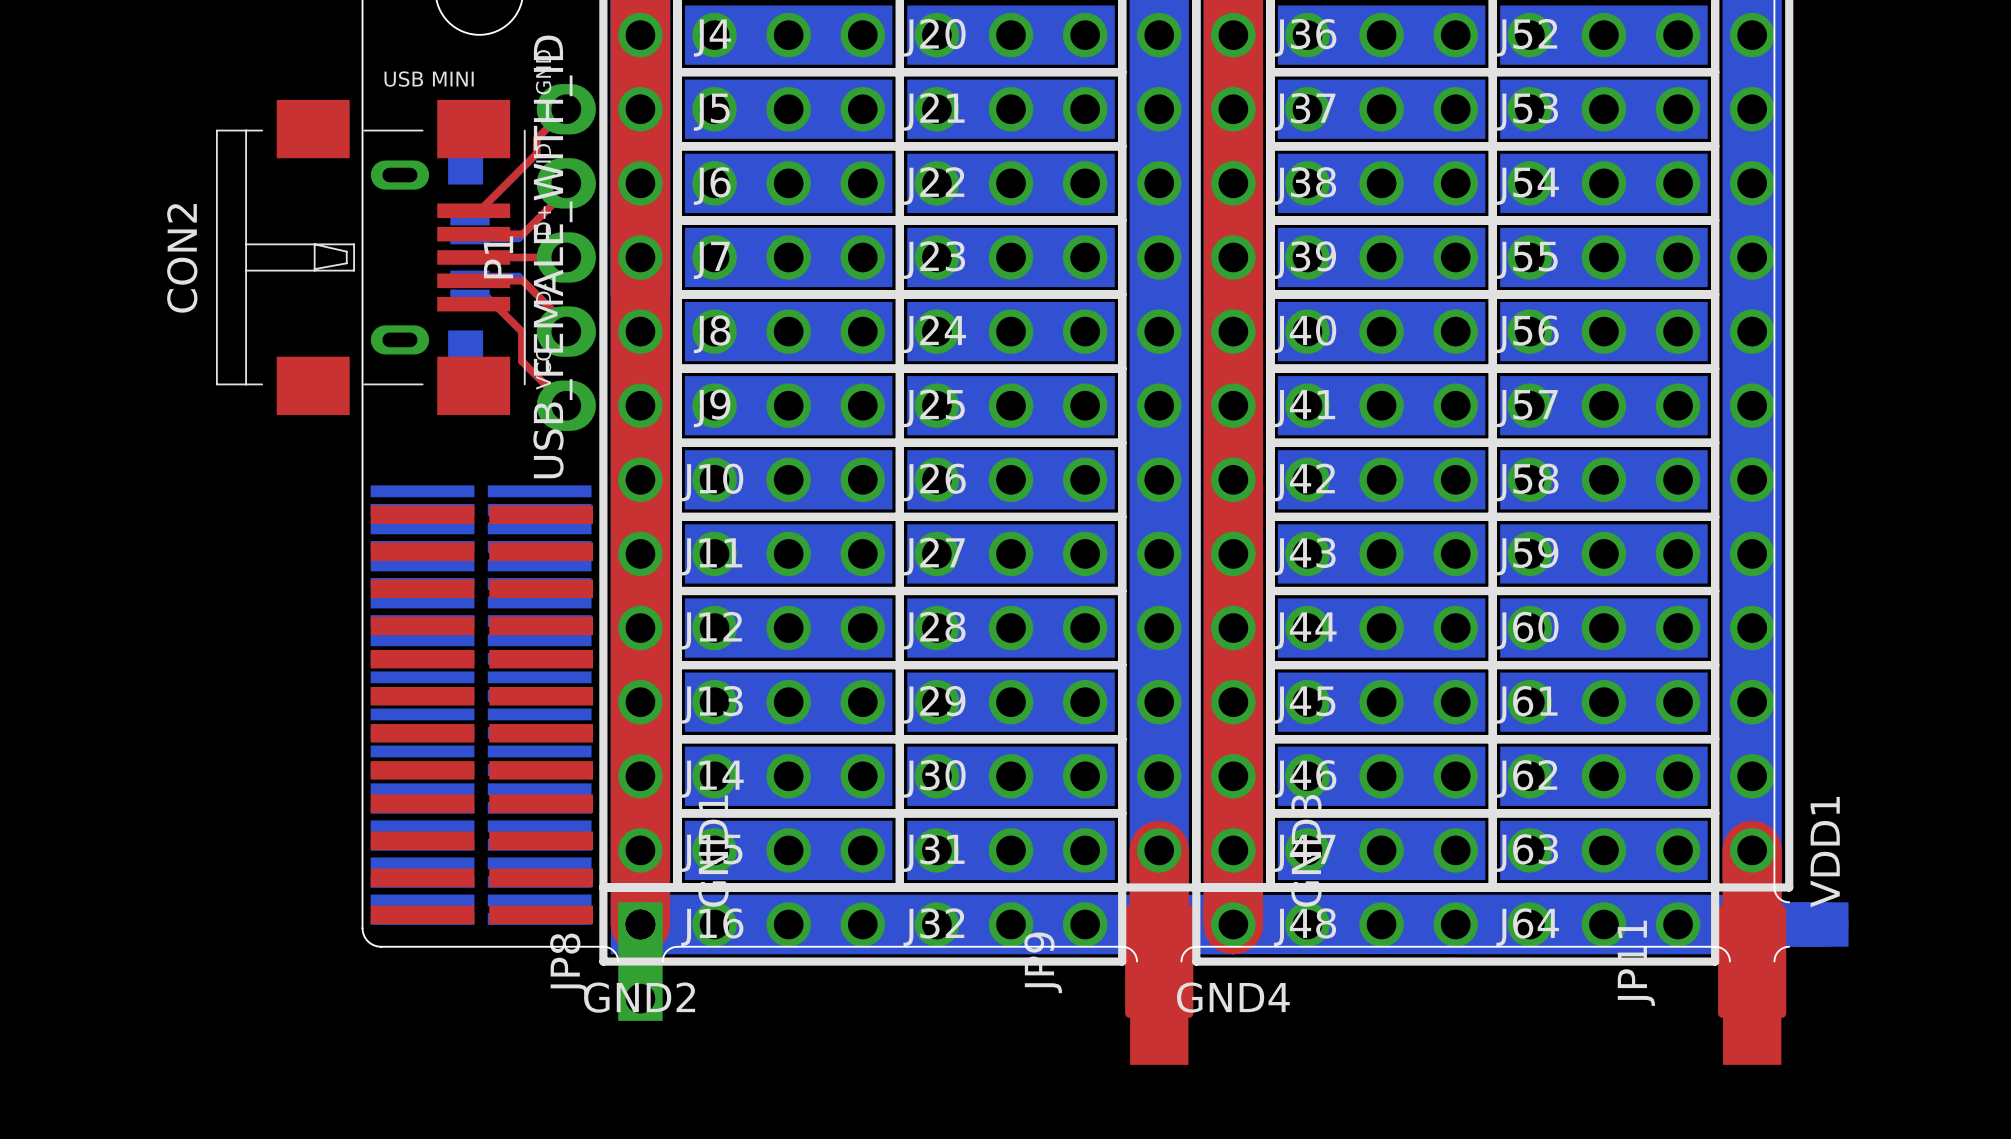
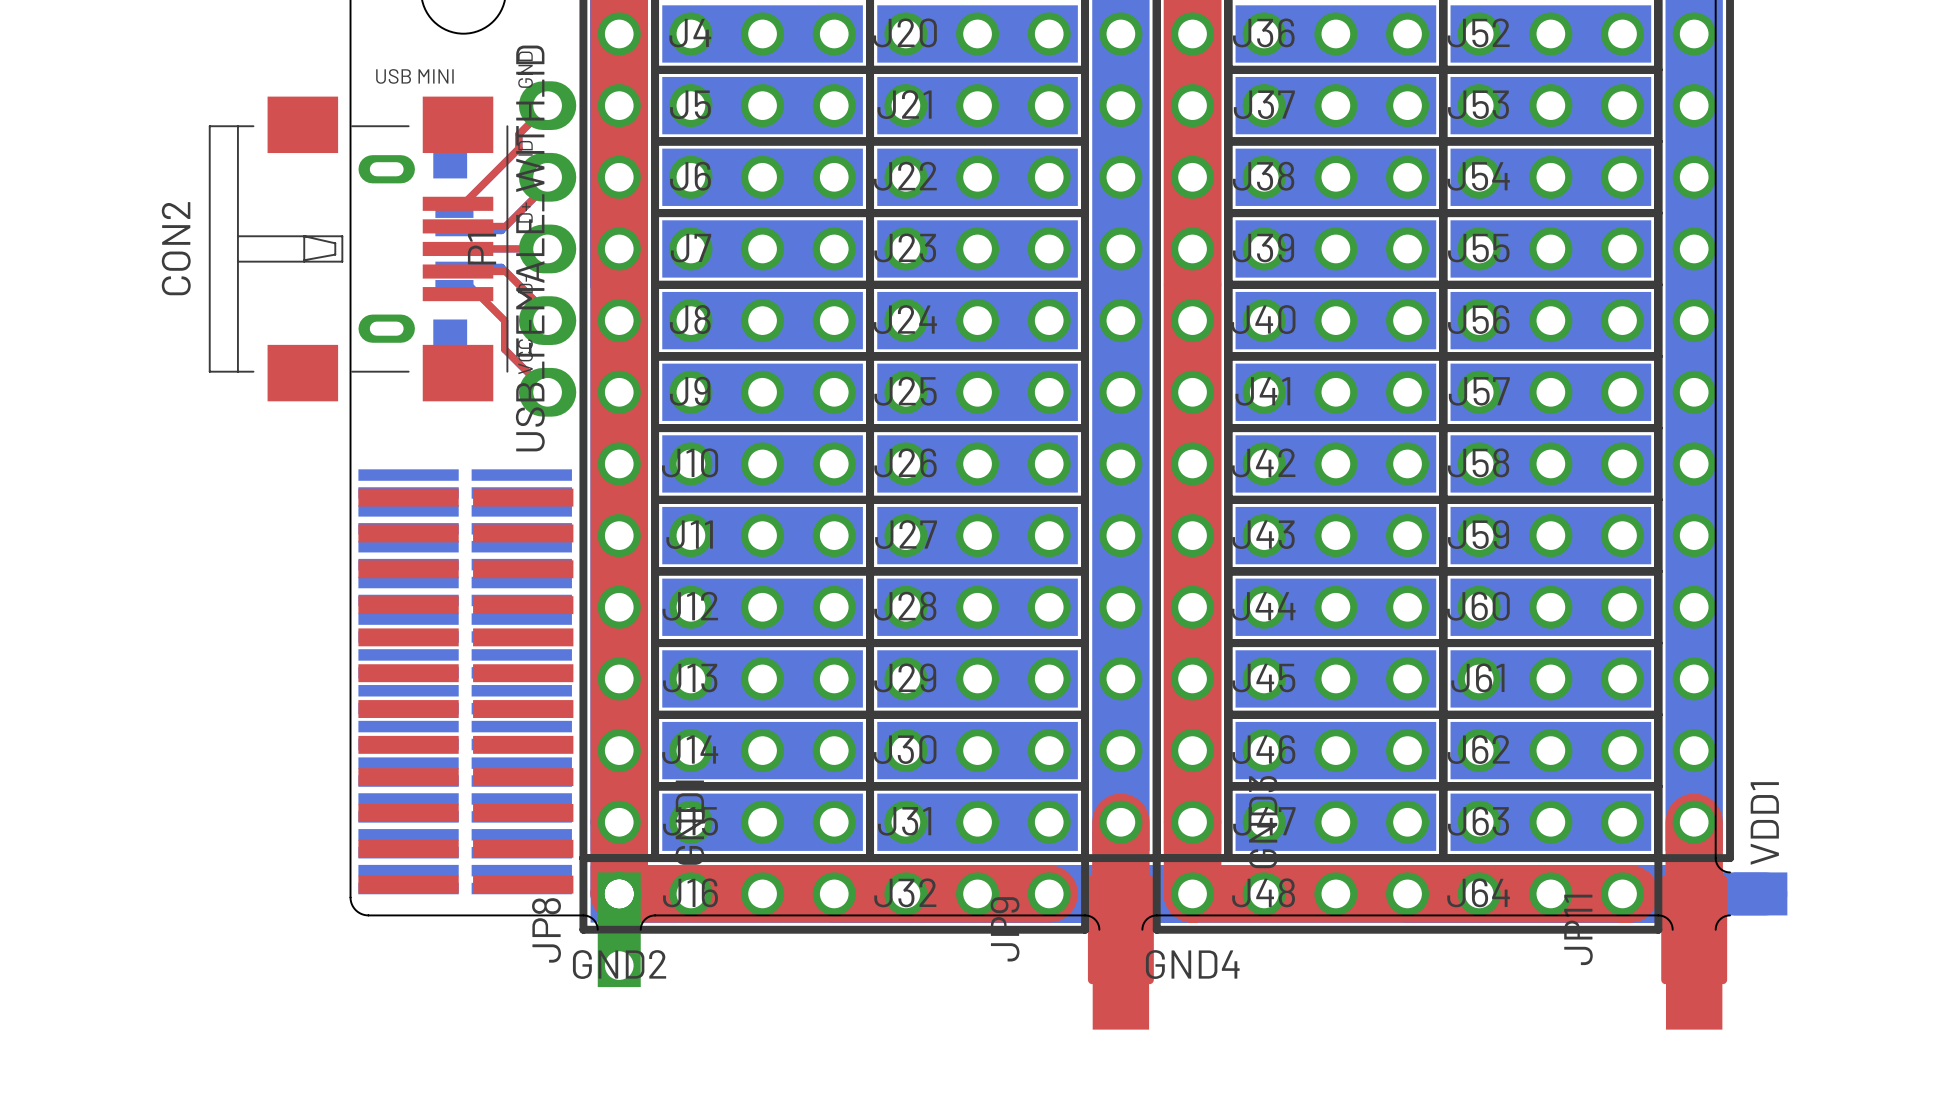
top track: none -> (619, 893) (1049, 893)
top track: none -> (1192, 893) (1629, 893)

